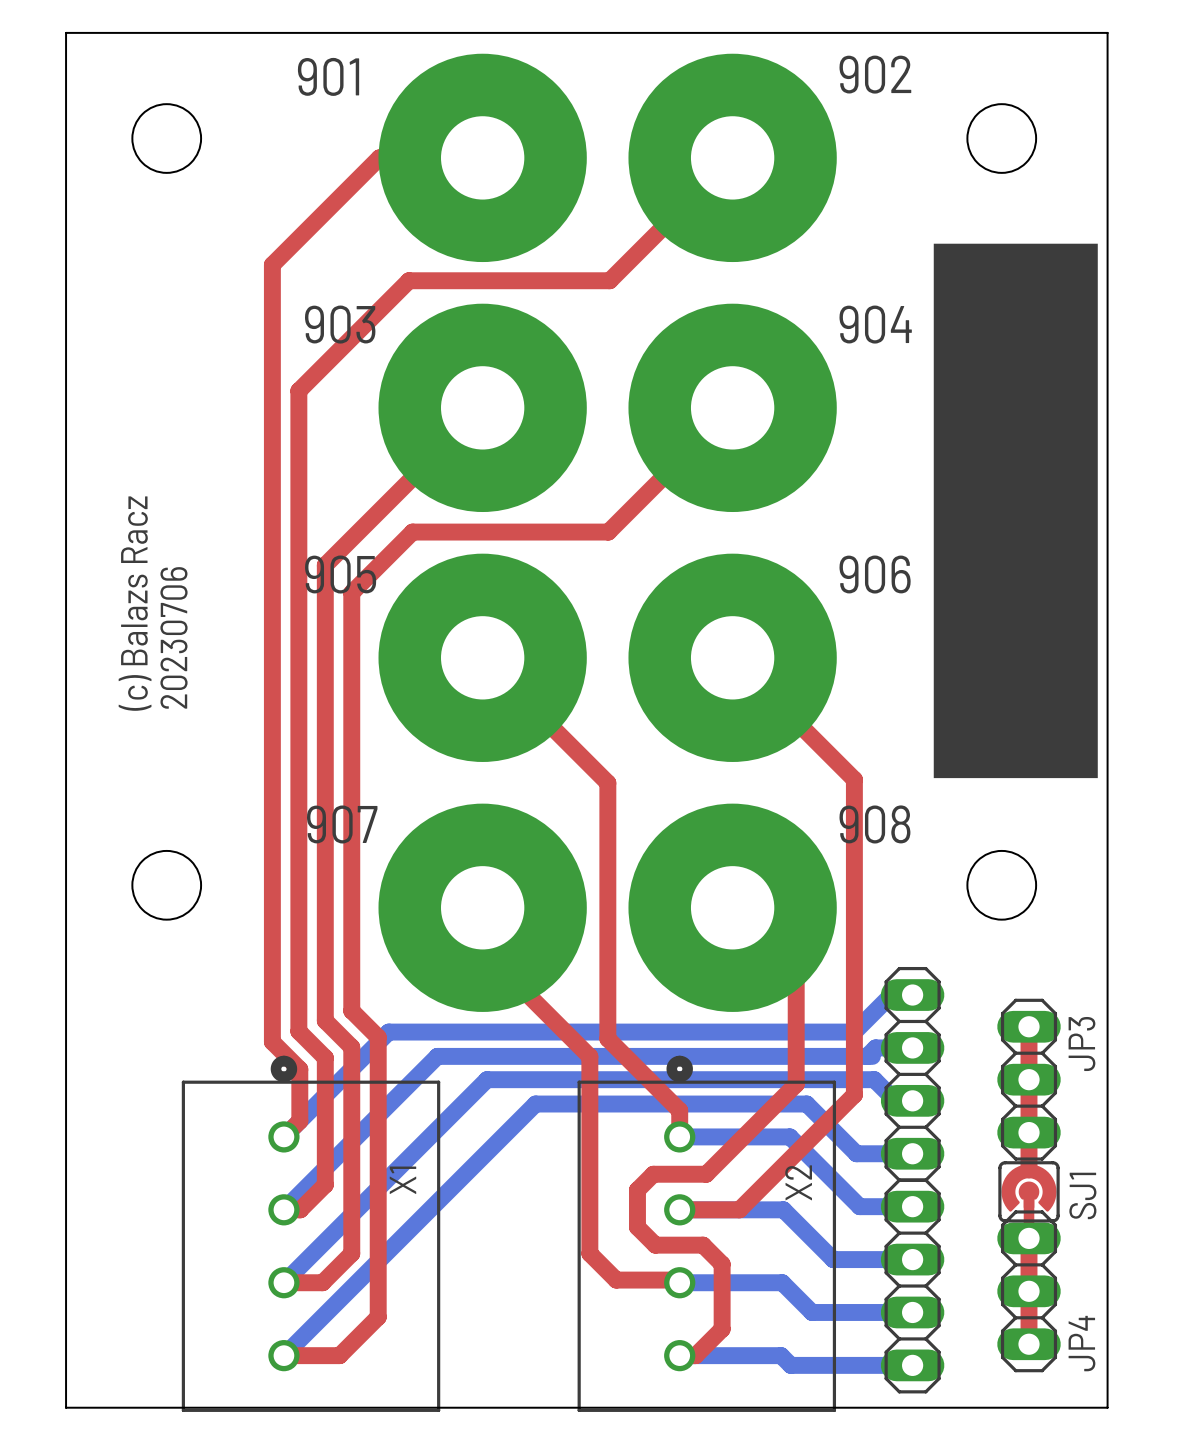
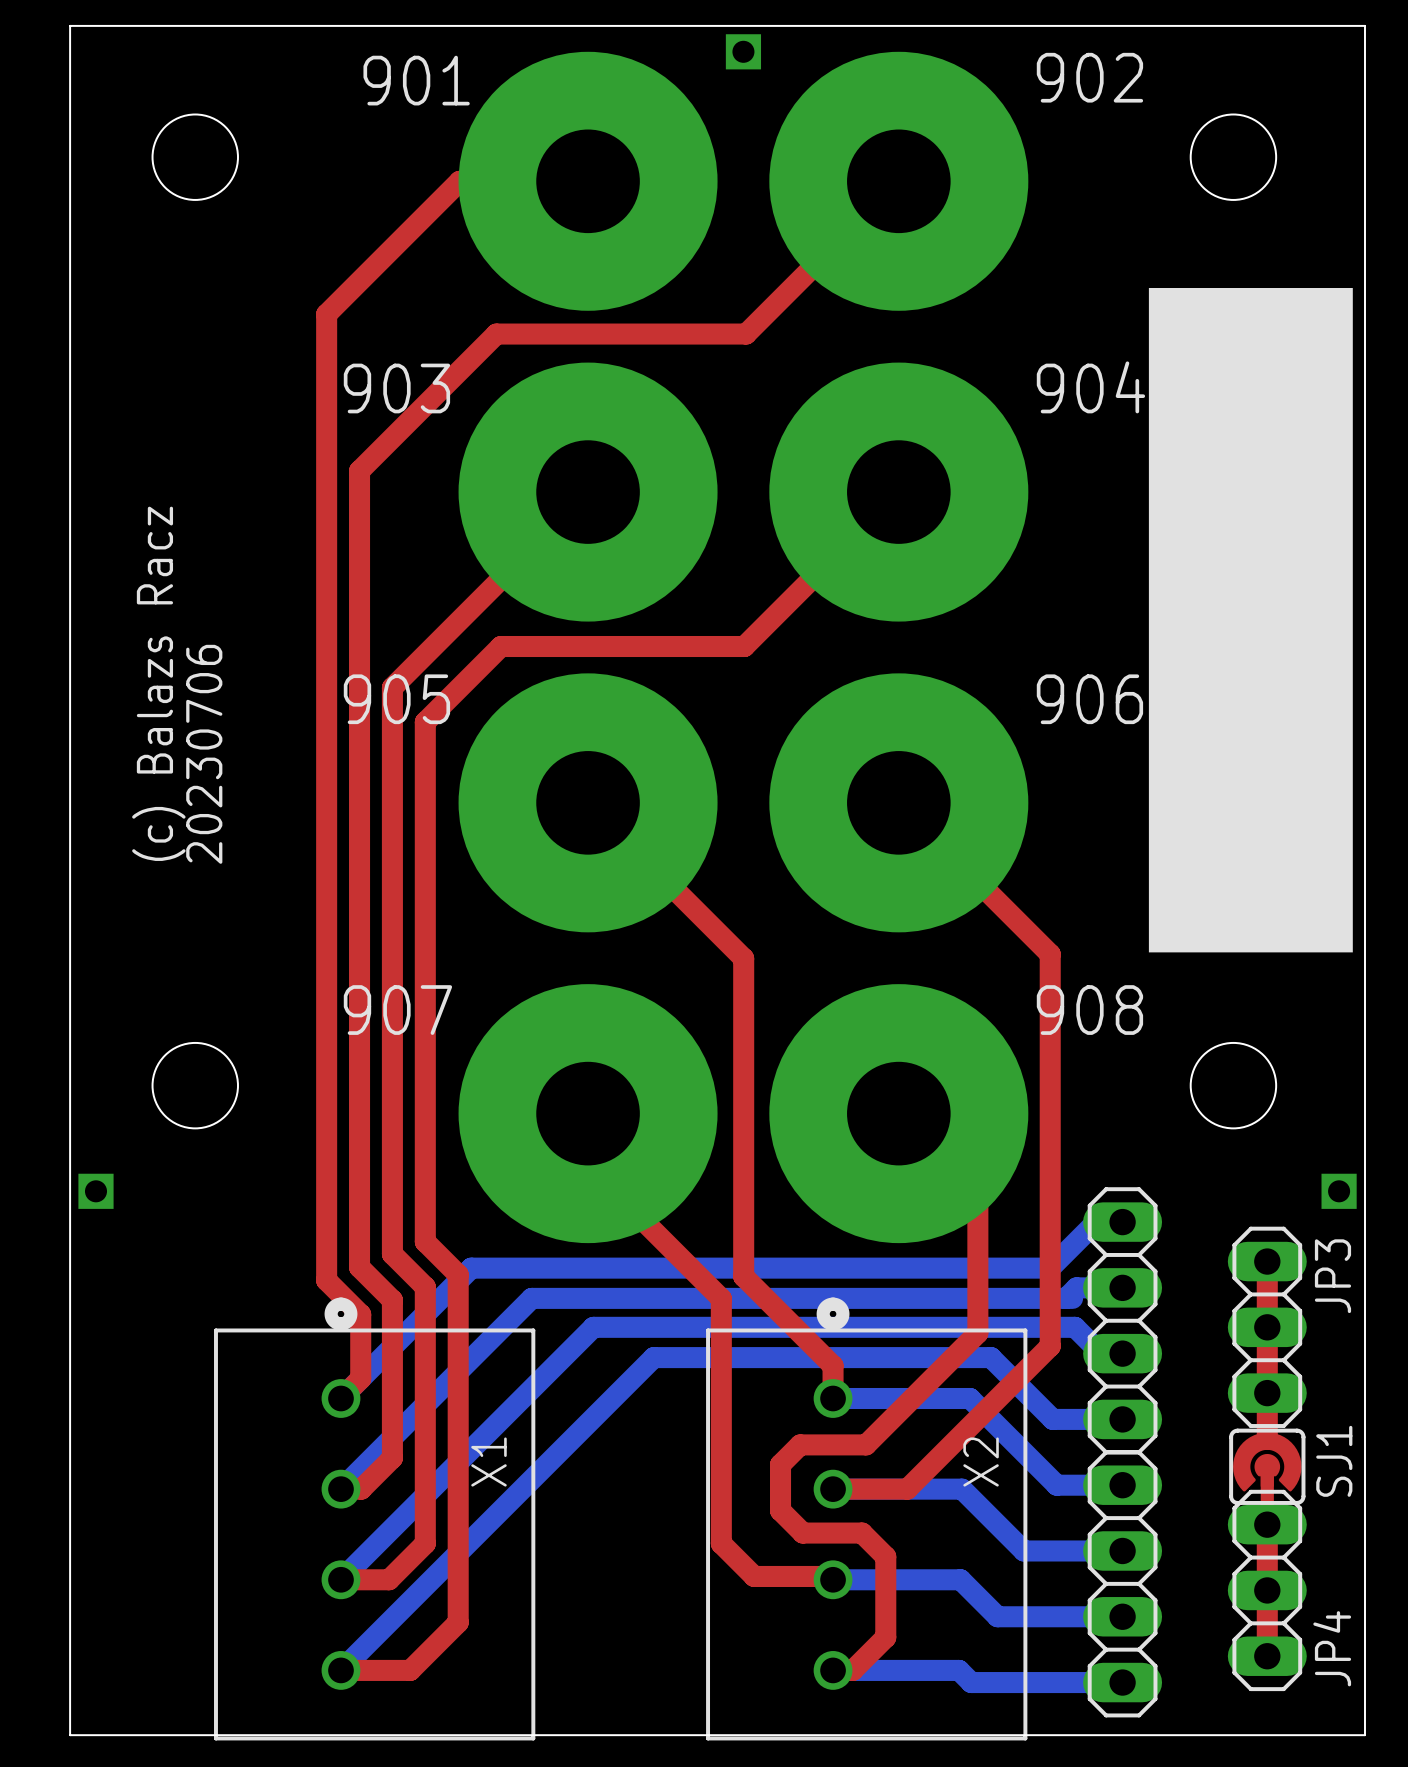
part: none -> (743, 51)
part: none -> (95, 1191)
part: none -> (1339, 1191)

